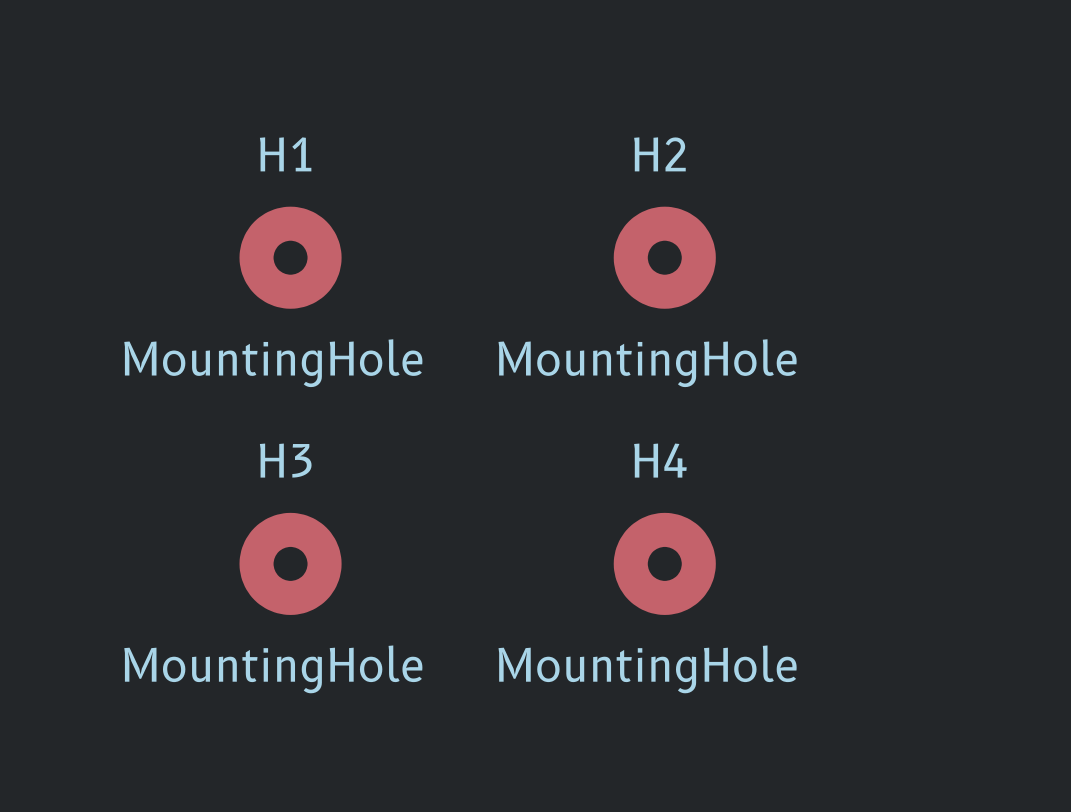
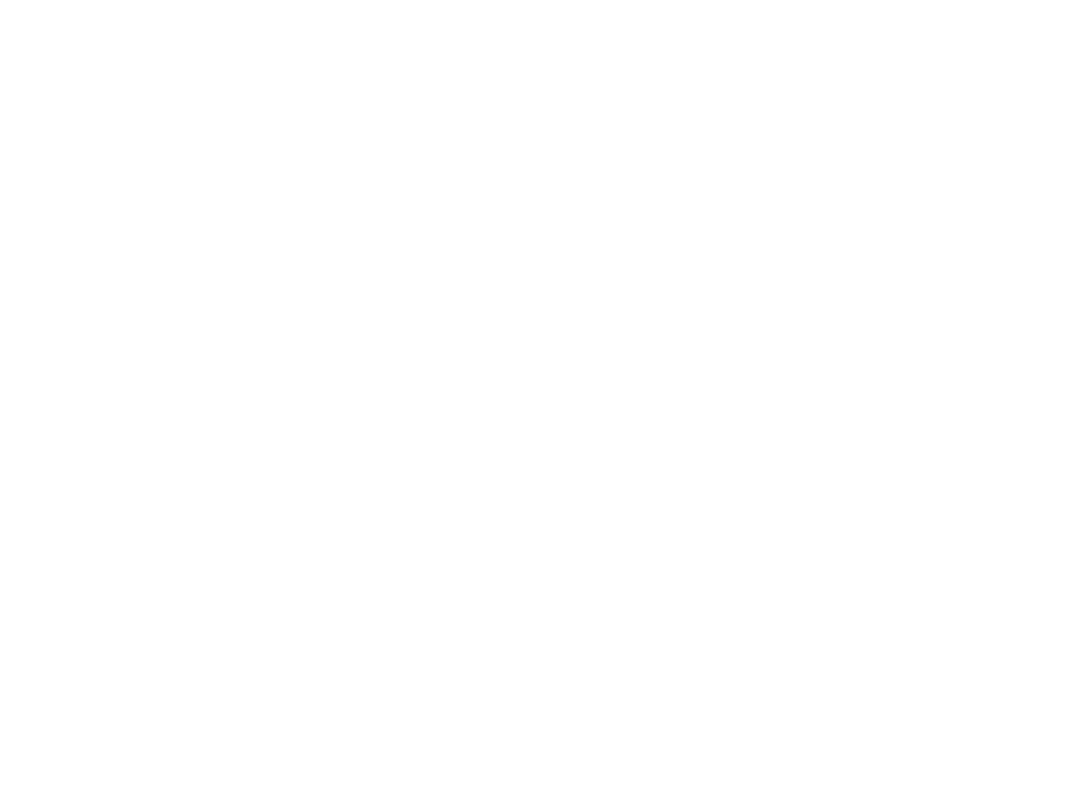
H1: MountingHole (290, 257) -> none
H2: MountingHole (664, 257) -> none
H3: MountingHole (290, 563) -> none
H4: MountingHole (664, 563) -> none

